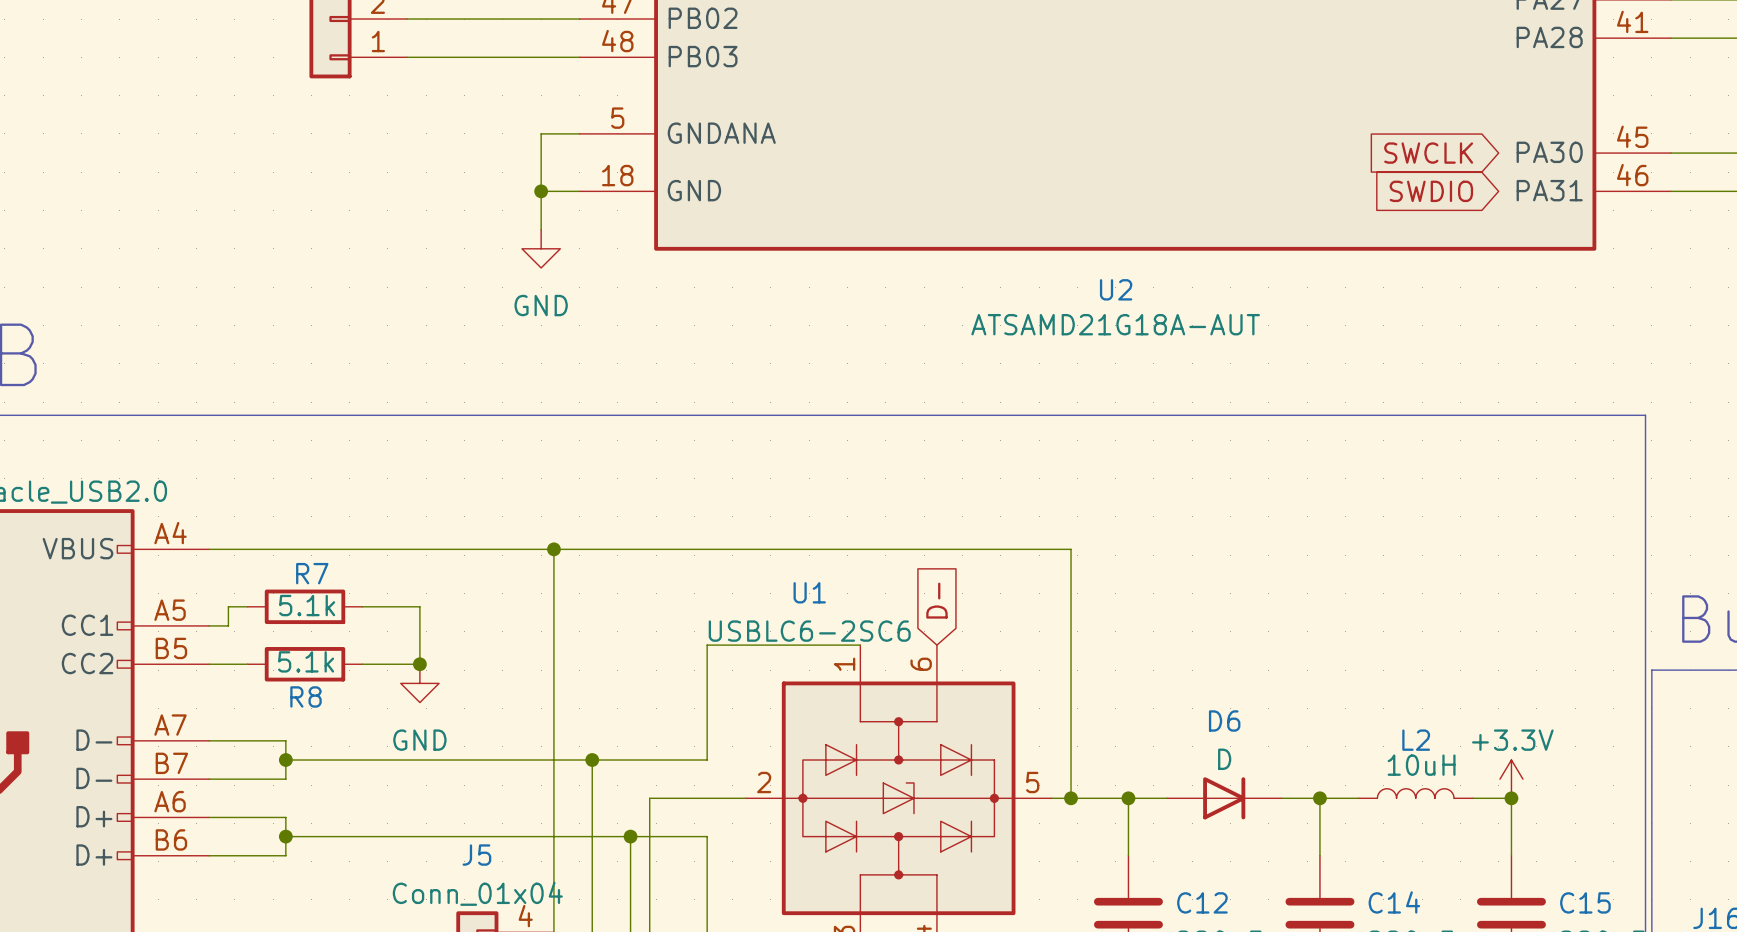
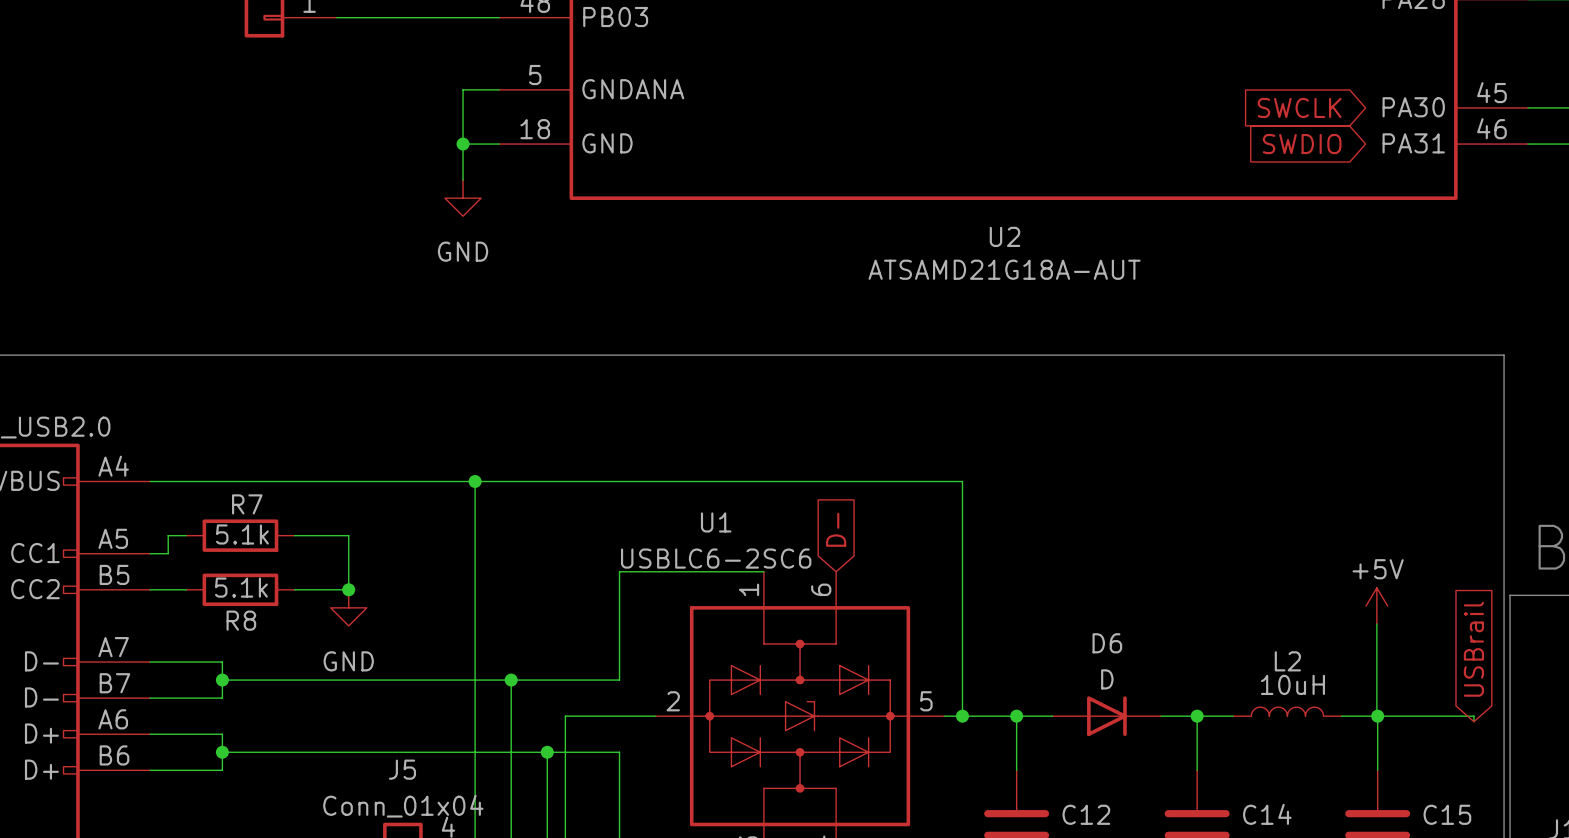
power symbol: none -> +5V (1376, 606)
wire: none -> (1376, 624) (1376, 716)
global label: none -> USBrail (1473, 649)
power symbol: +3.3V (1511, 779) -> none
wire: none -> (1377, 716) (1473, 716) (1473, 721)

